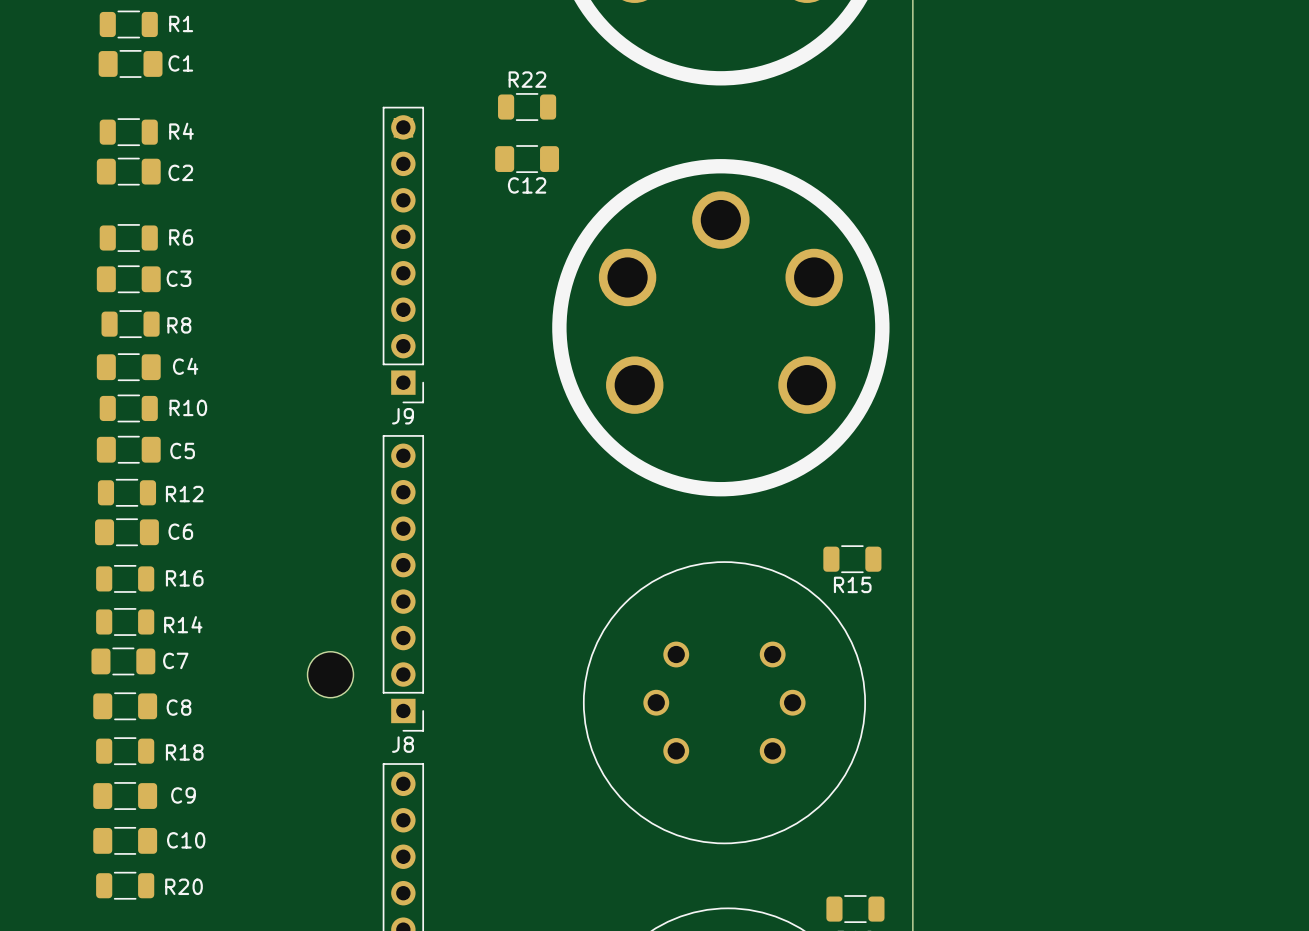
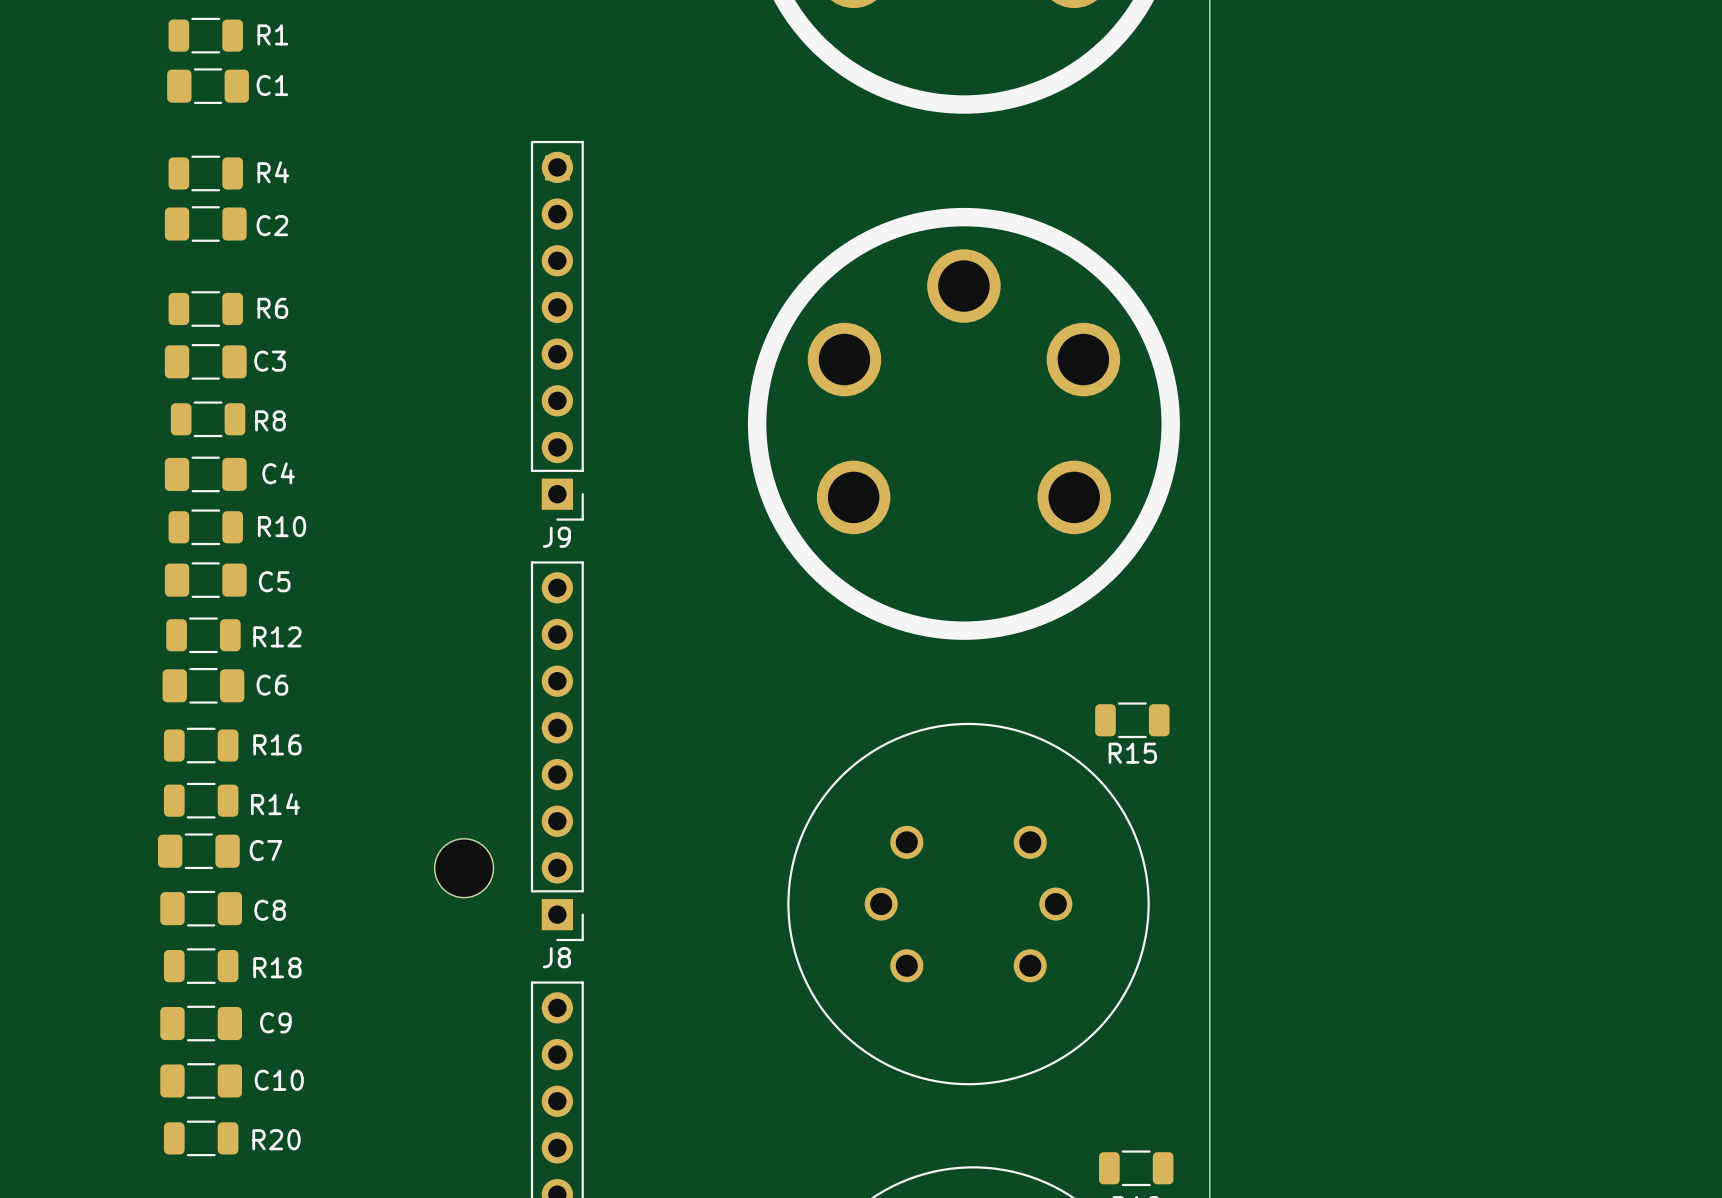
R22: (527, 107) -> none
C12: (527, 159) -> none

